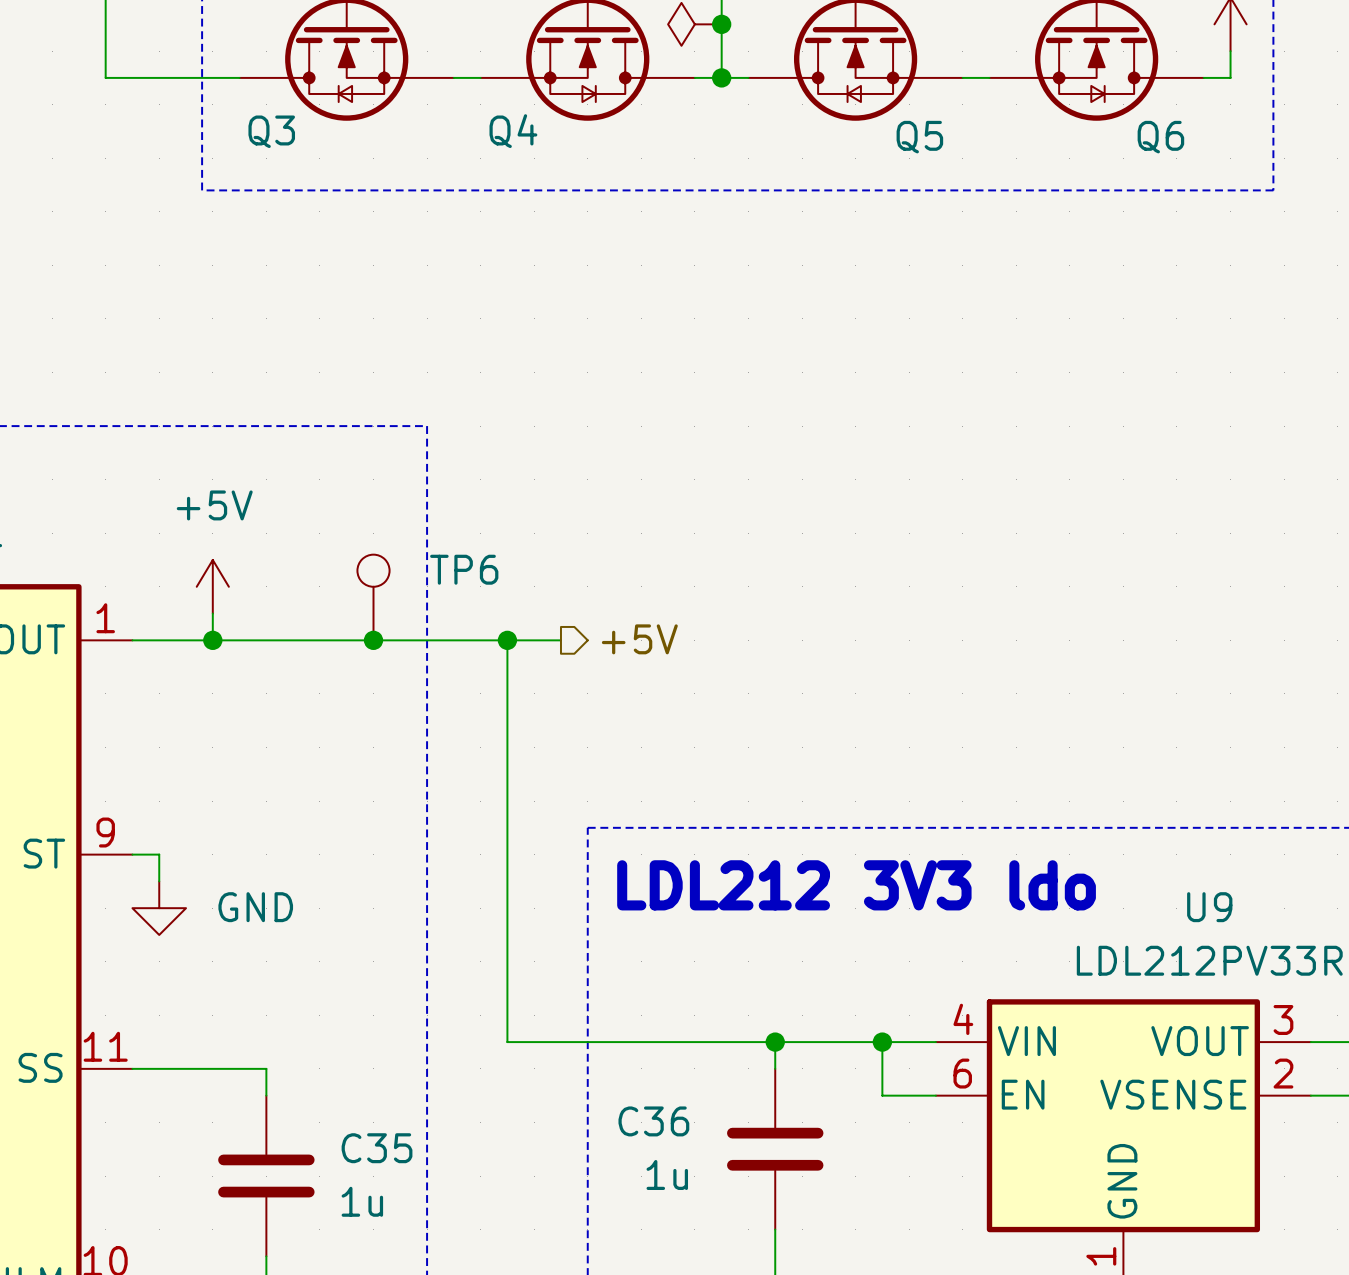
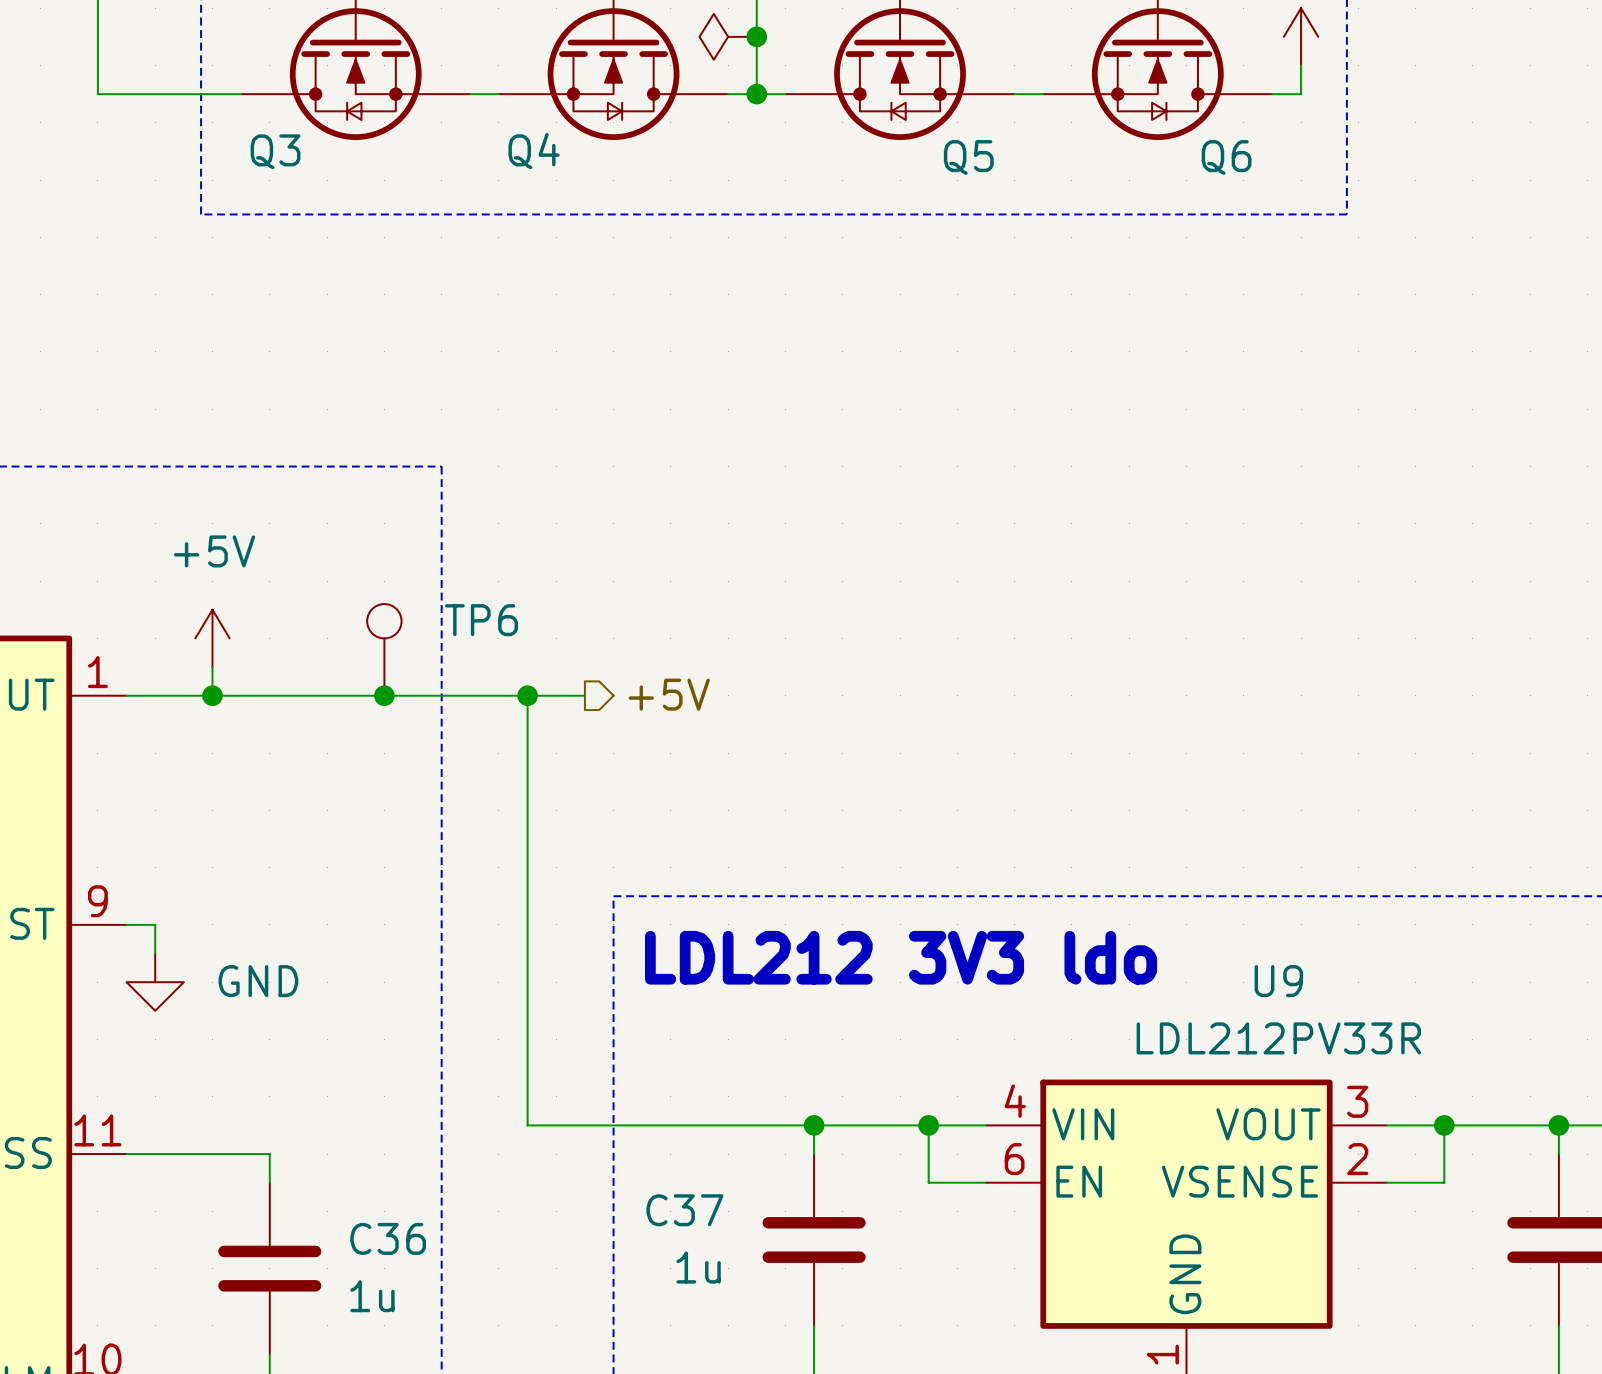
C36 name: C36 (653, 1121) -> C37 (684, 1210)
C35 name: C35 (377, 1148) -> C36 (388, 1238)

